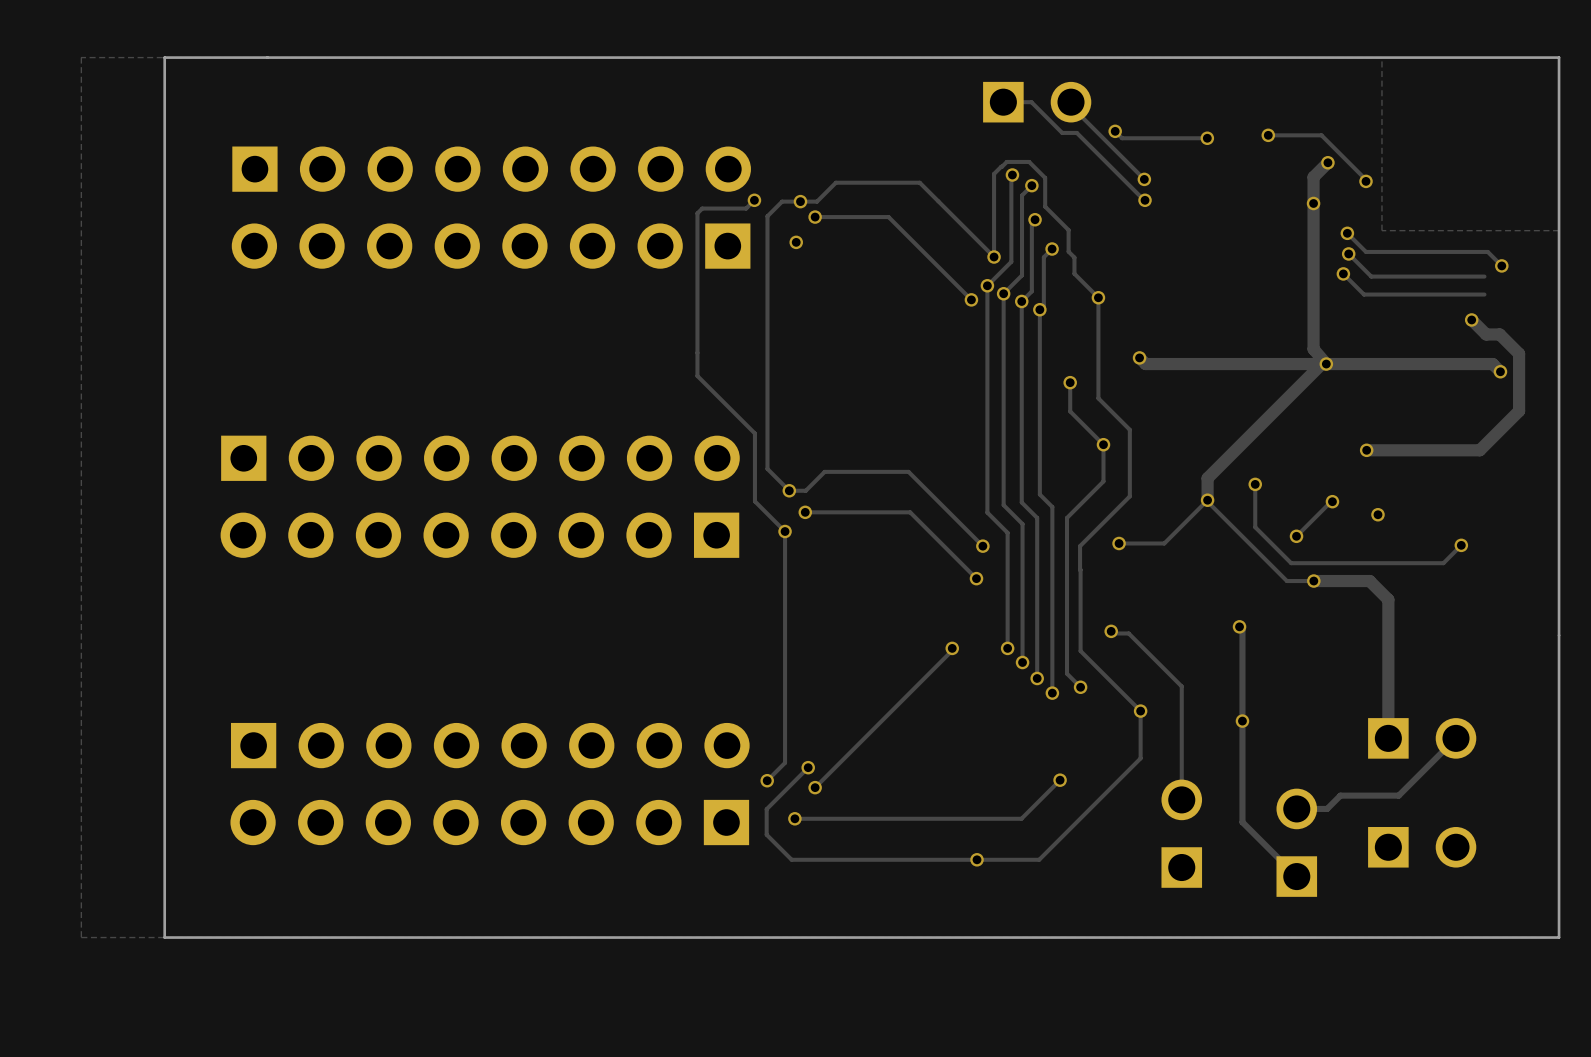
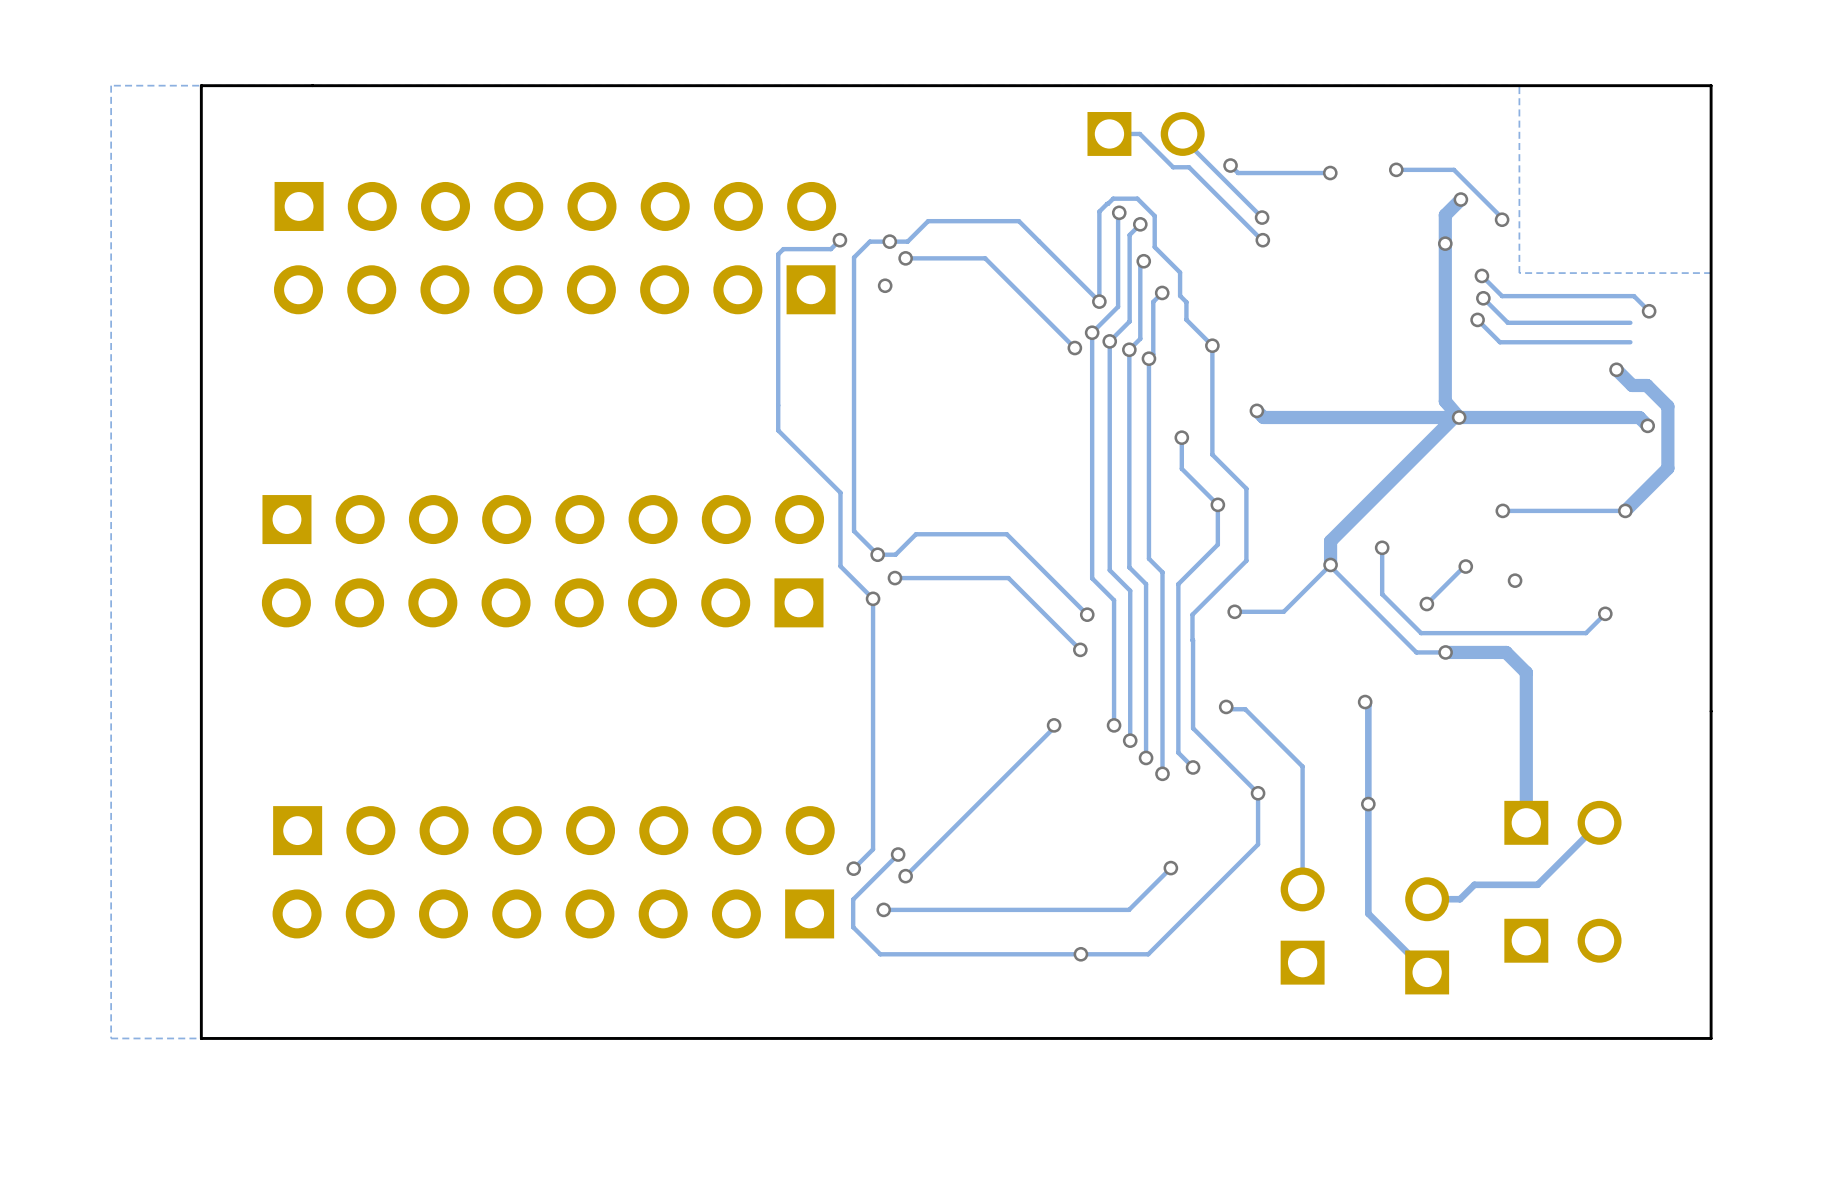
track width: thick (1479, 450) (1366, 450) -> thin (1625, 510) (1502, 510)
via: none -> (1625, 510)

